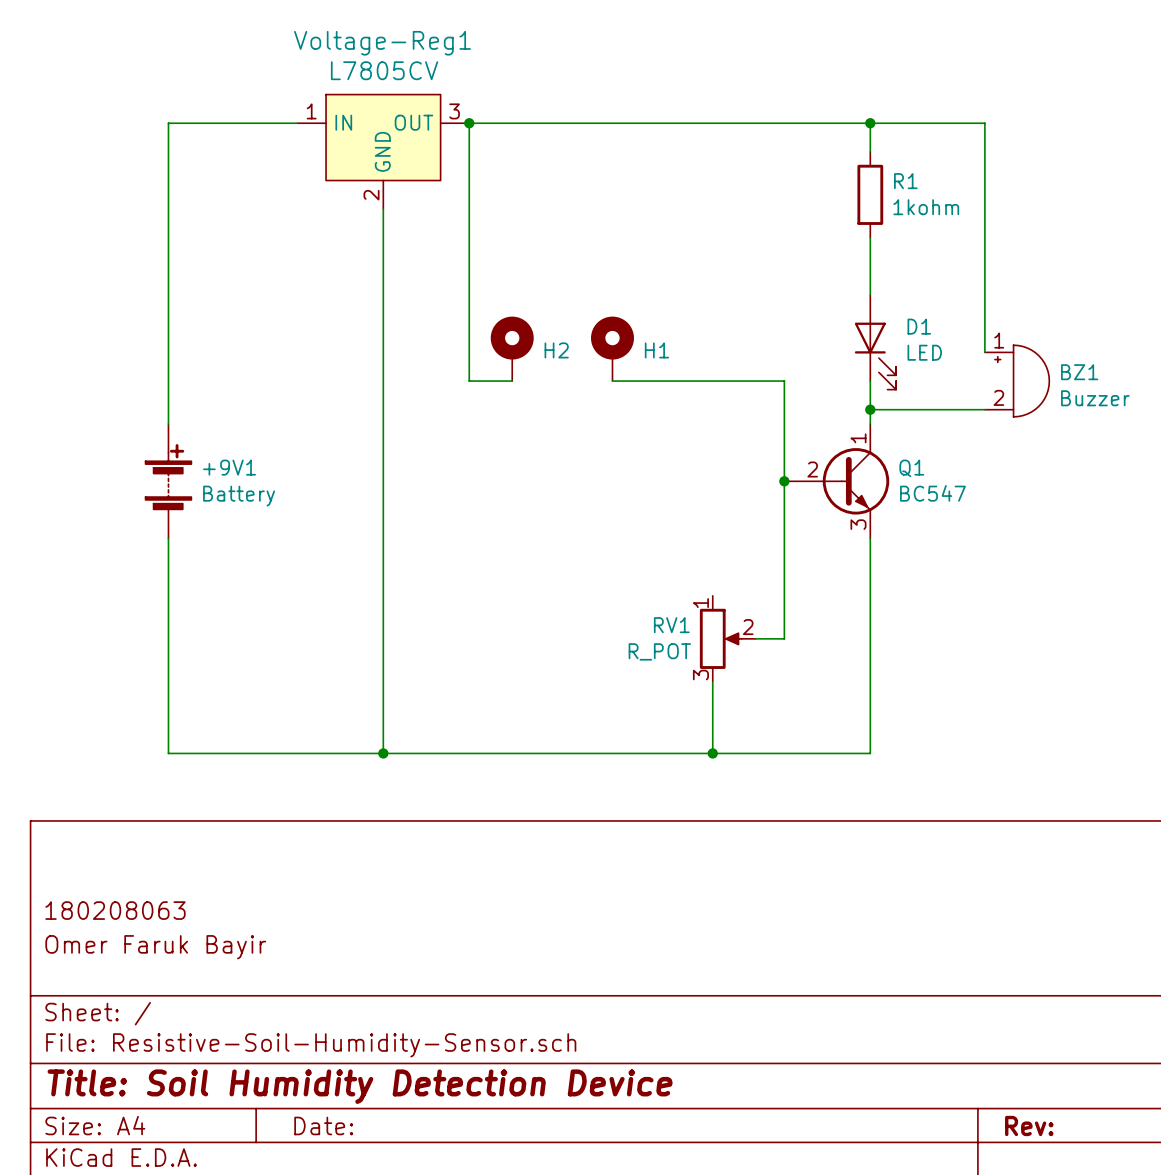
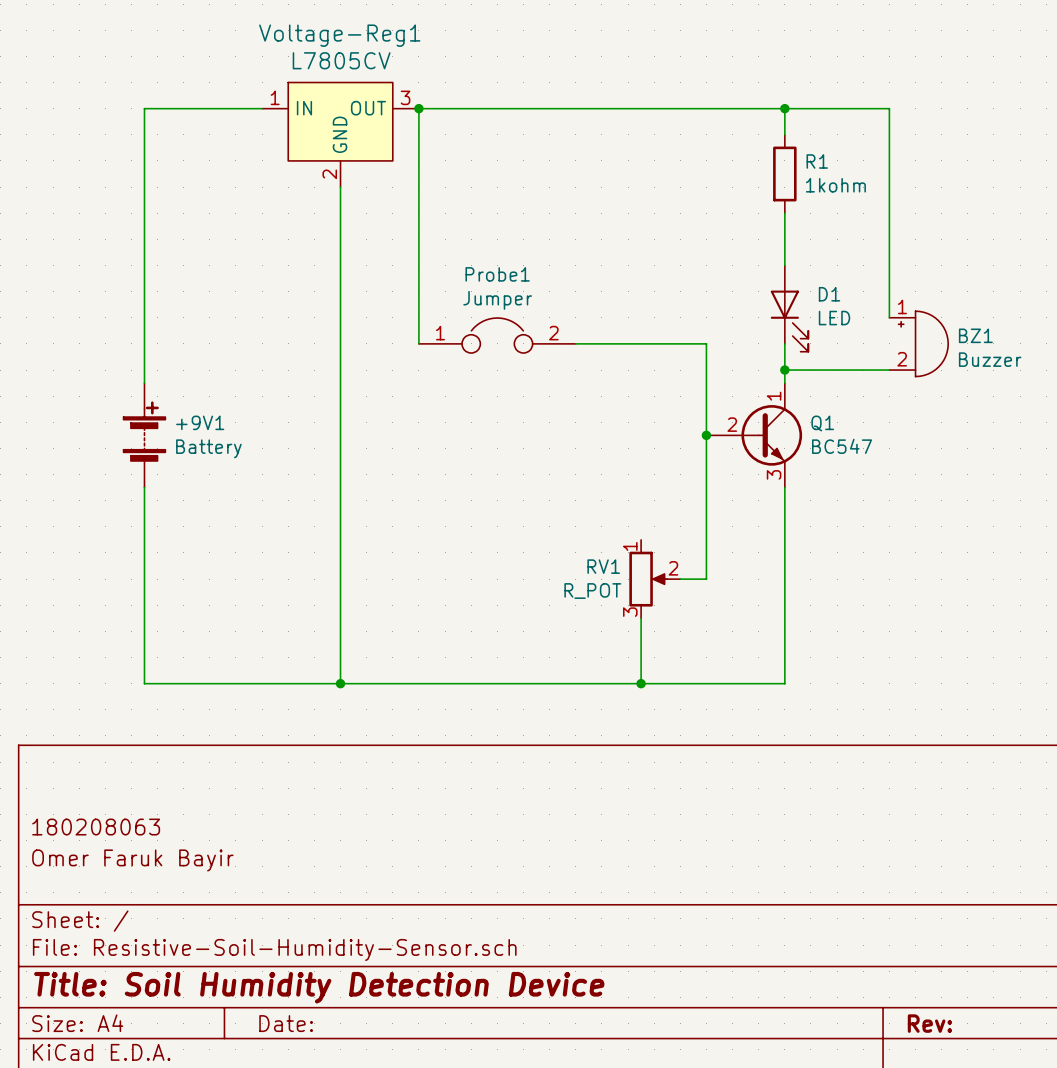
H2: (512, 348) -> none
H1: (612, 348) -> none
Probe1: none -> Jumper (497, 335)

